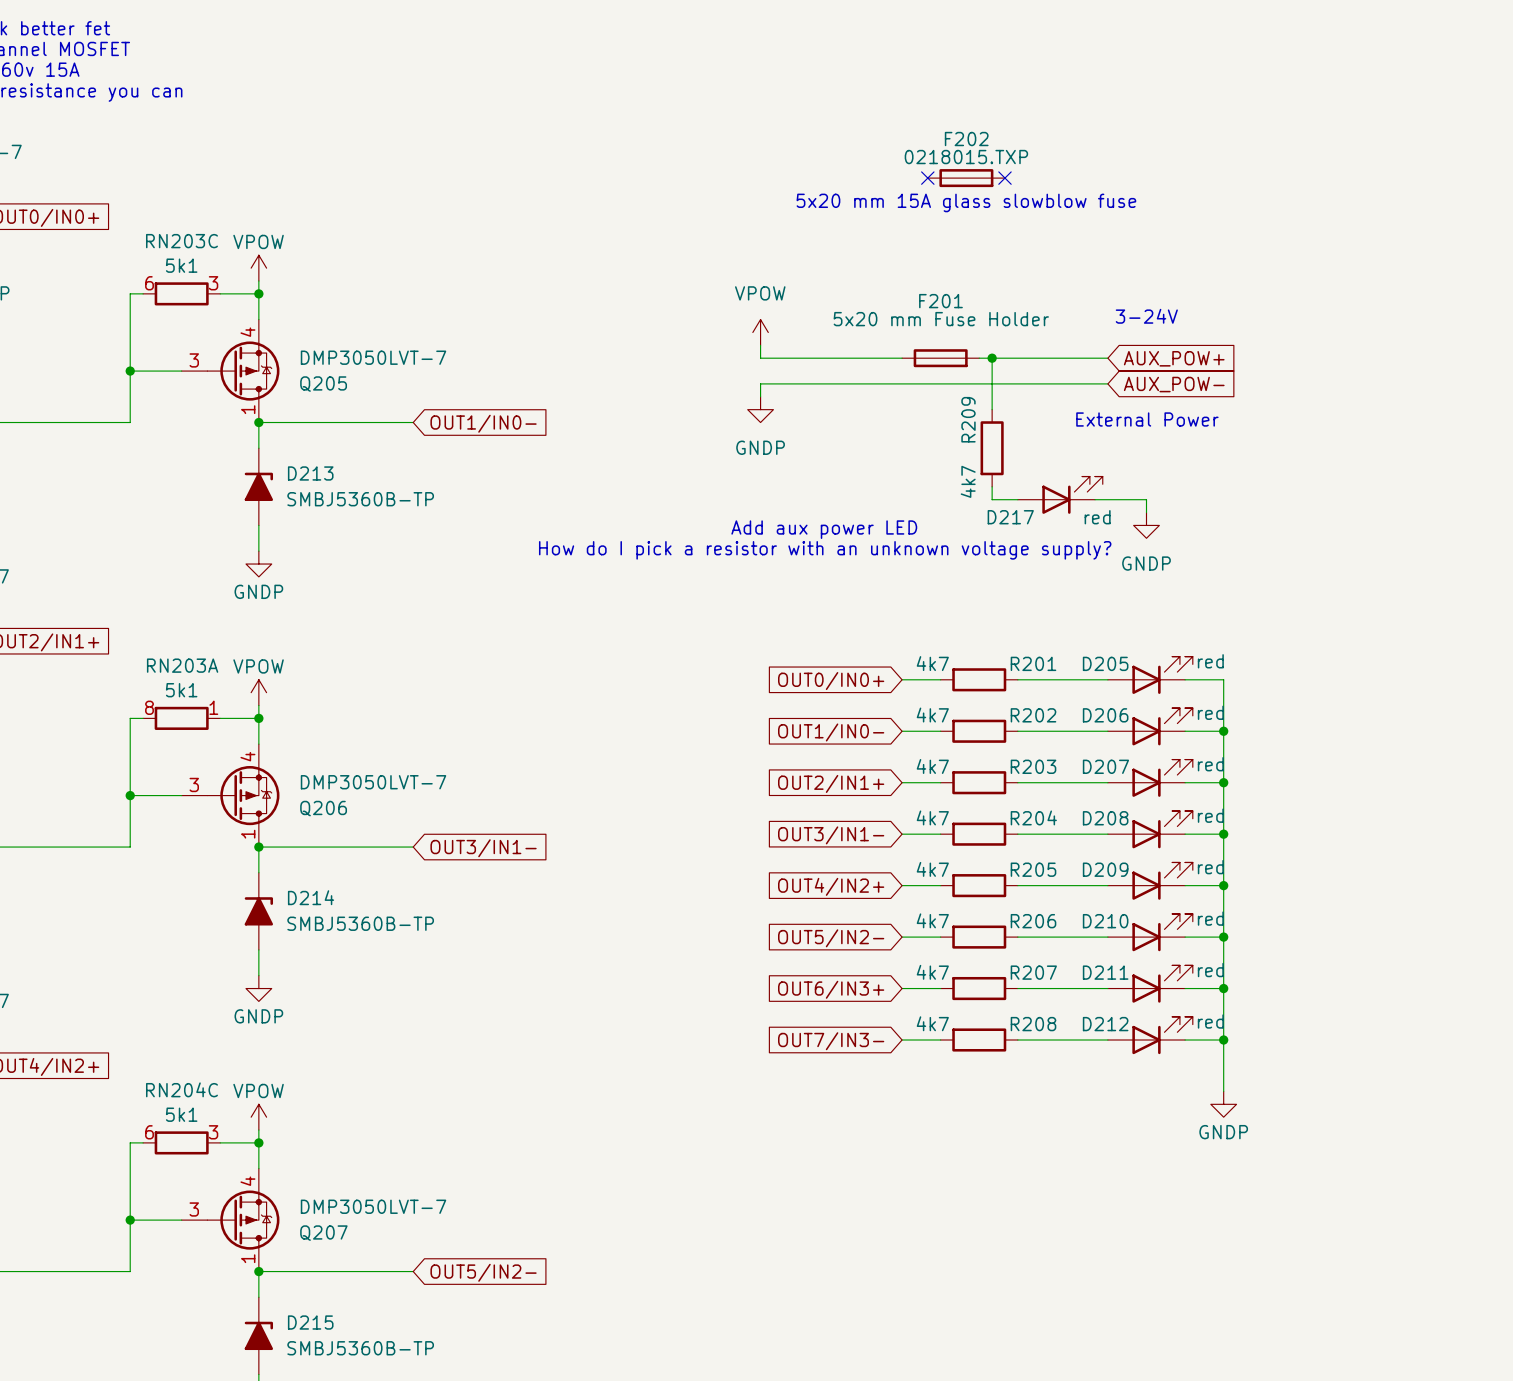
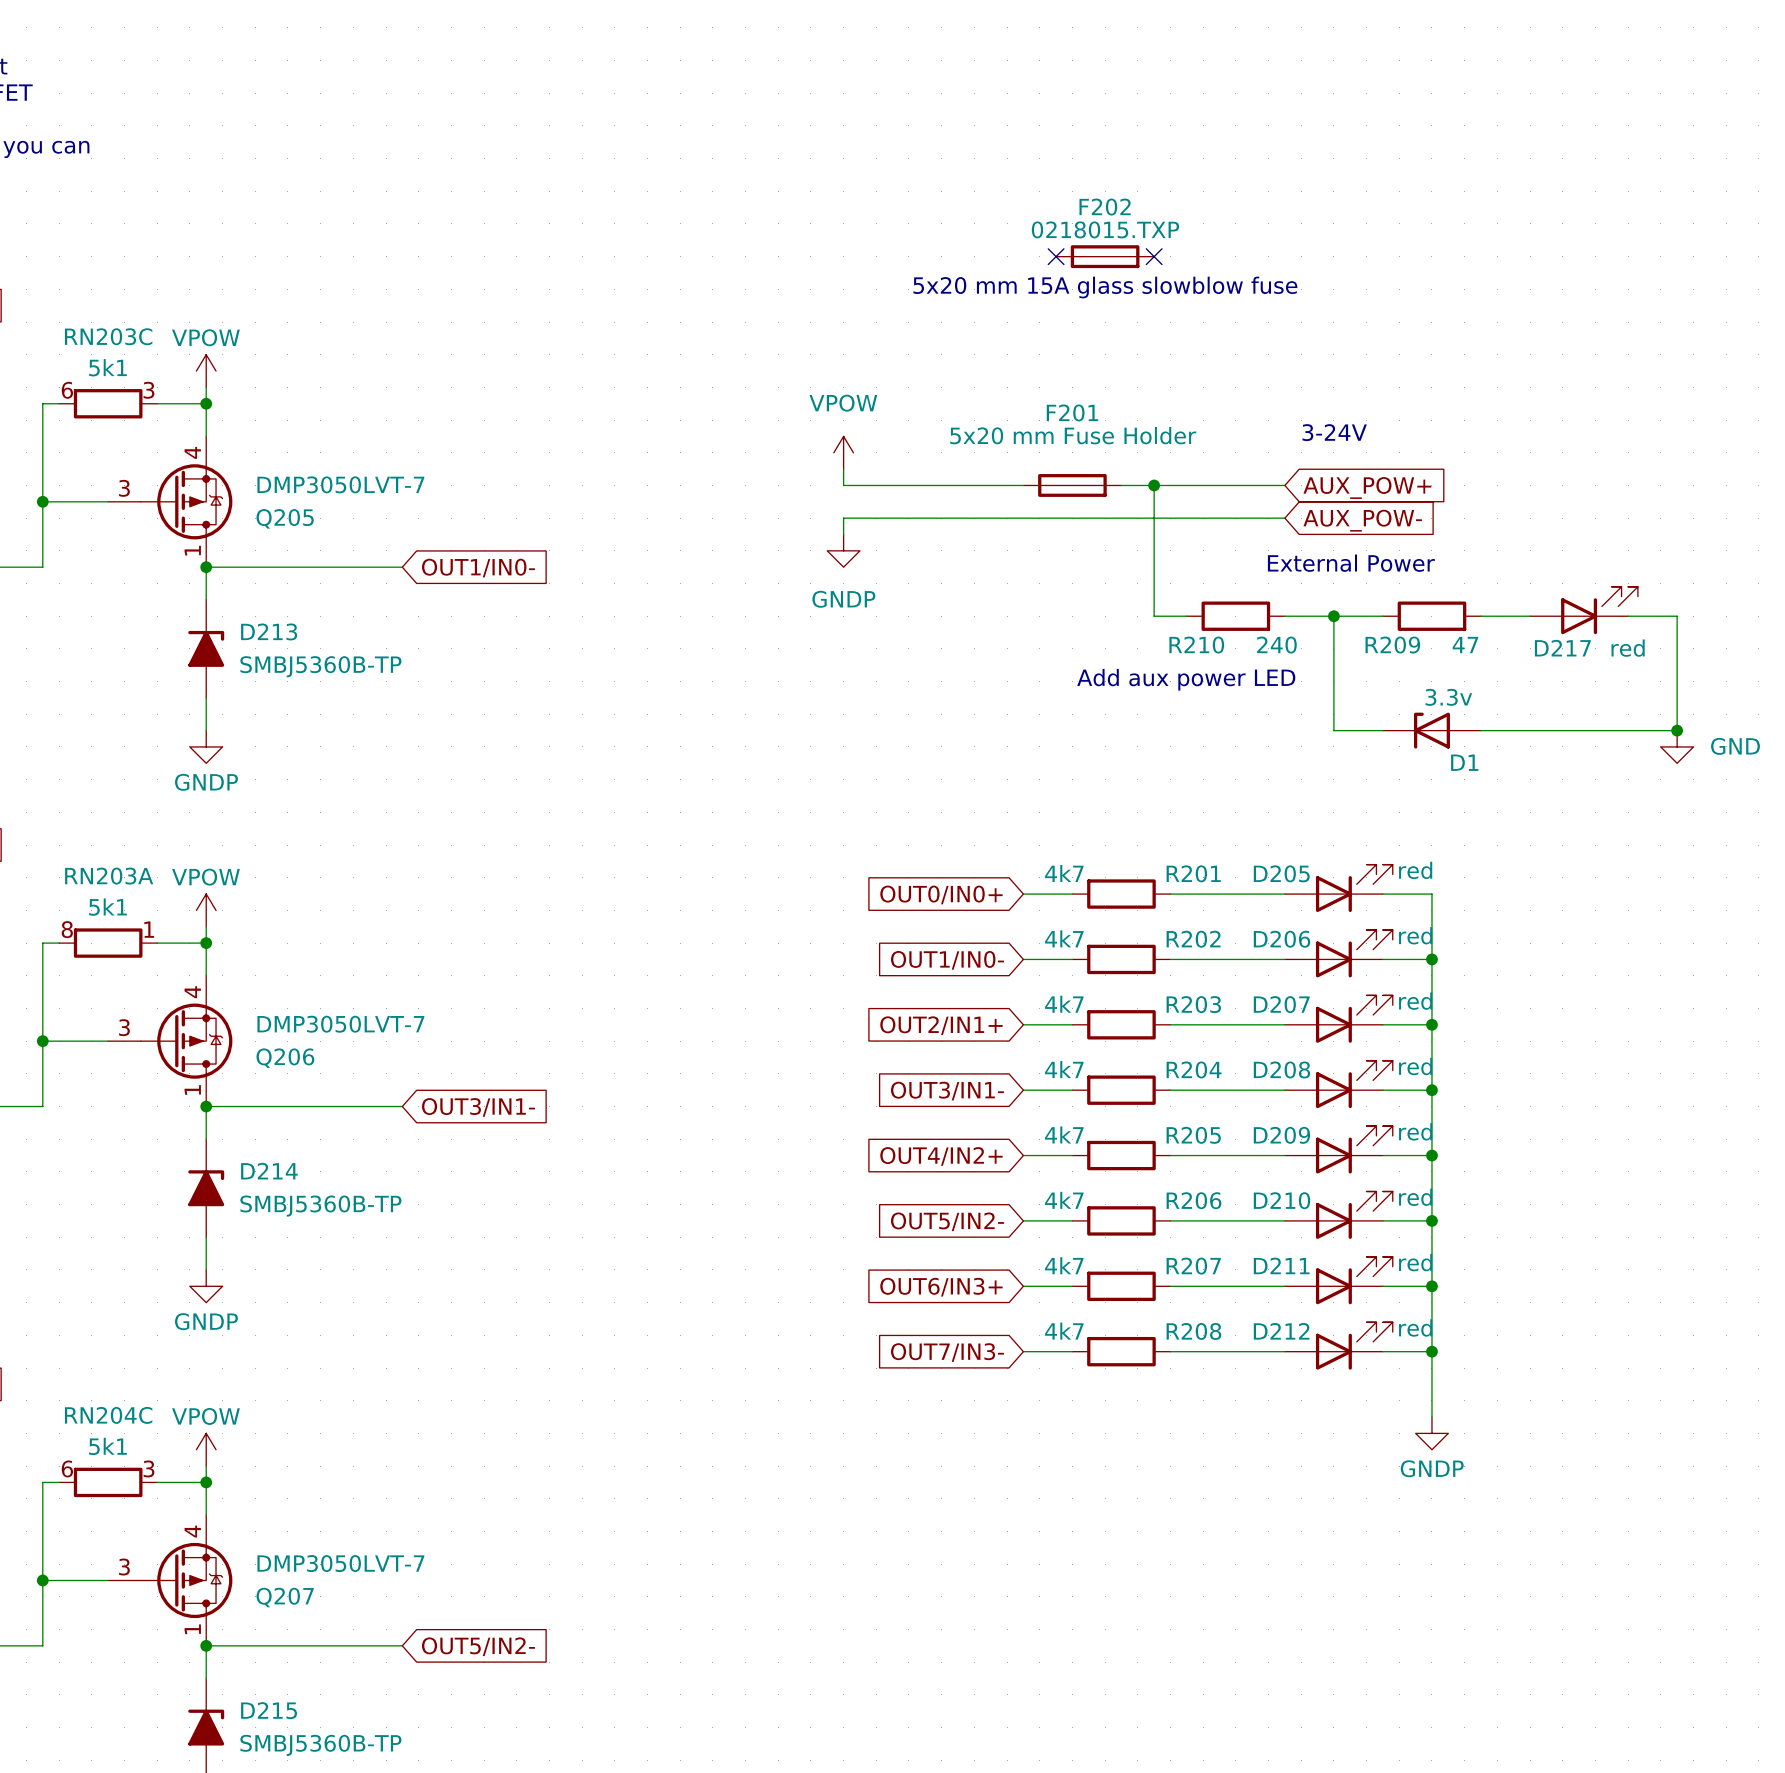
wire: (992, 358) (992, 409) -> none
junction position: (992, 358) -> (1154, 485)
wire: none -> (1154, 485) (1154, 616) (1186, 616)
R209 name position: R209 (968, 419) -> R209 (1392, 645)
text position: External Power (1147, 419) -> External Power (1351, 563)
R209 rotation: 0° (992, 448) -> 90° clockwise (1431, 616)
R209 position: (992, 448) -> (1431, 616)
R210: none -> 240 (1235, 616)
wire: none -> (1284, 616) (1382, 616)
junction: none -> (1333, 616)
wire: none -> (1481, 616) (1530, 616)
wire: none -> (1628, 616) (1677, 616) (1677, 730) (1481, 730)
R209 value: 4k7 (968, 481) -> 47 (1465, 645)
wire: (992, 486) (992, 499) (1017, 499) -> none
D217 position: (1060, 495) -> (1583, 610)
wire: (1095, 499) (1146, 499) -> (1333, 616) (1333, 665)
wire: none -> (1333, 681) (1333, 730) (1382, 730)
D217 name position: D217 (1010, 517) -> D217 (1562, 648)
D217 value position: red (1097, 517) -> red (1628, 648)
power symbol: GNDP (1146, 525) -> none
text position: Add aux power LED (824, 529) -> Add aux power LED (1186, 679)
text: How do I pick a resistor with an unknown voltage supply? (825, 550) -> none
D1: none -> 3.3v (1431, 730)
junction: none -> (1677, 730)
power symbol: none -> GND (1677, 746)

